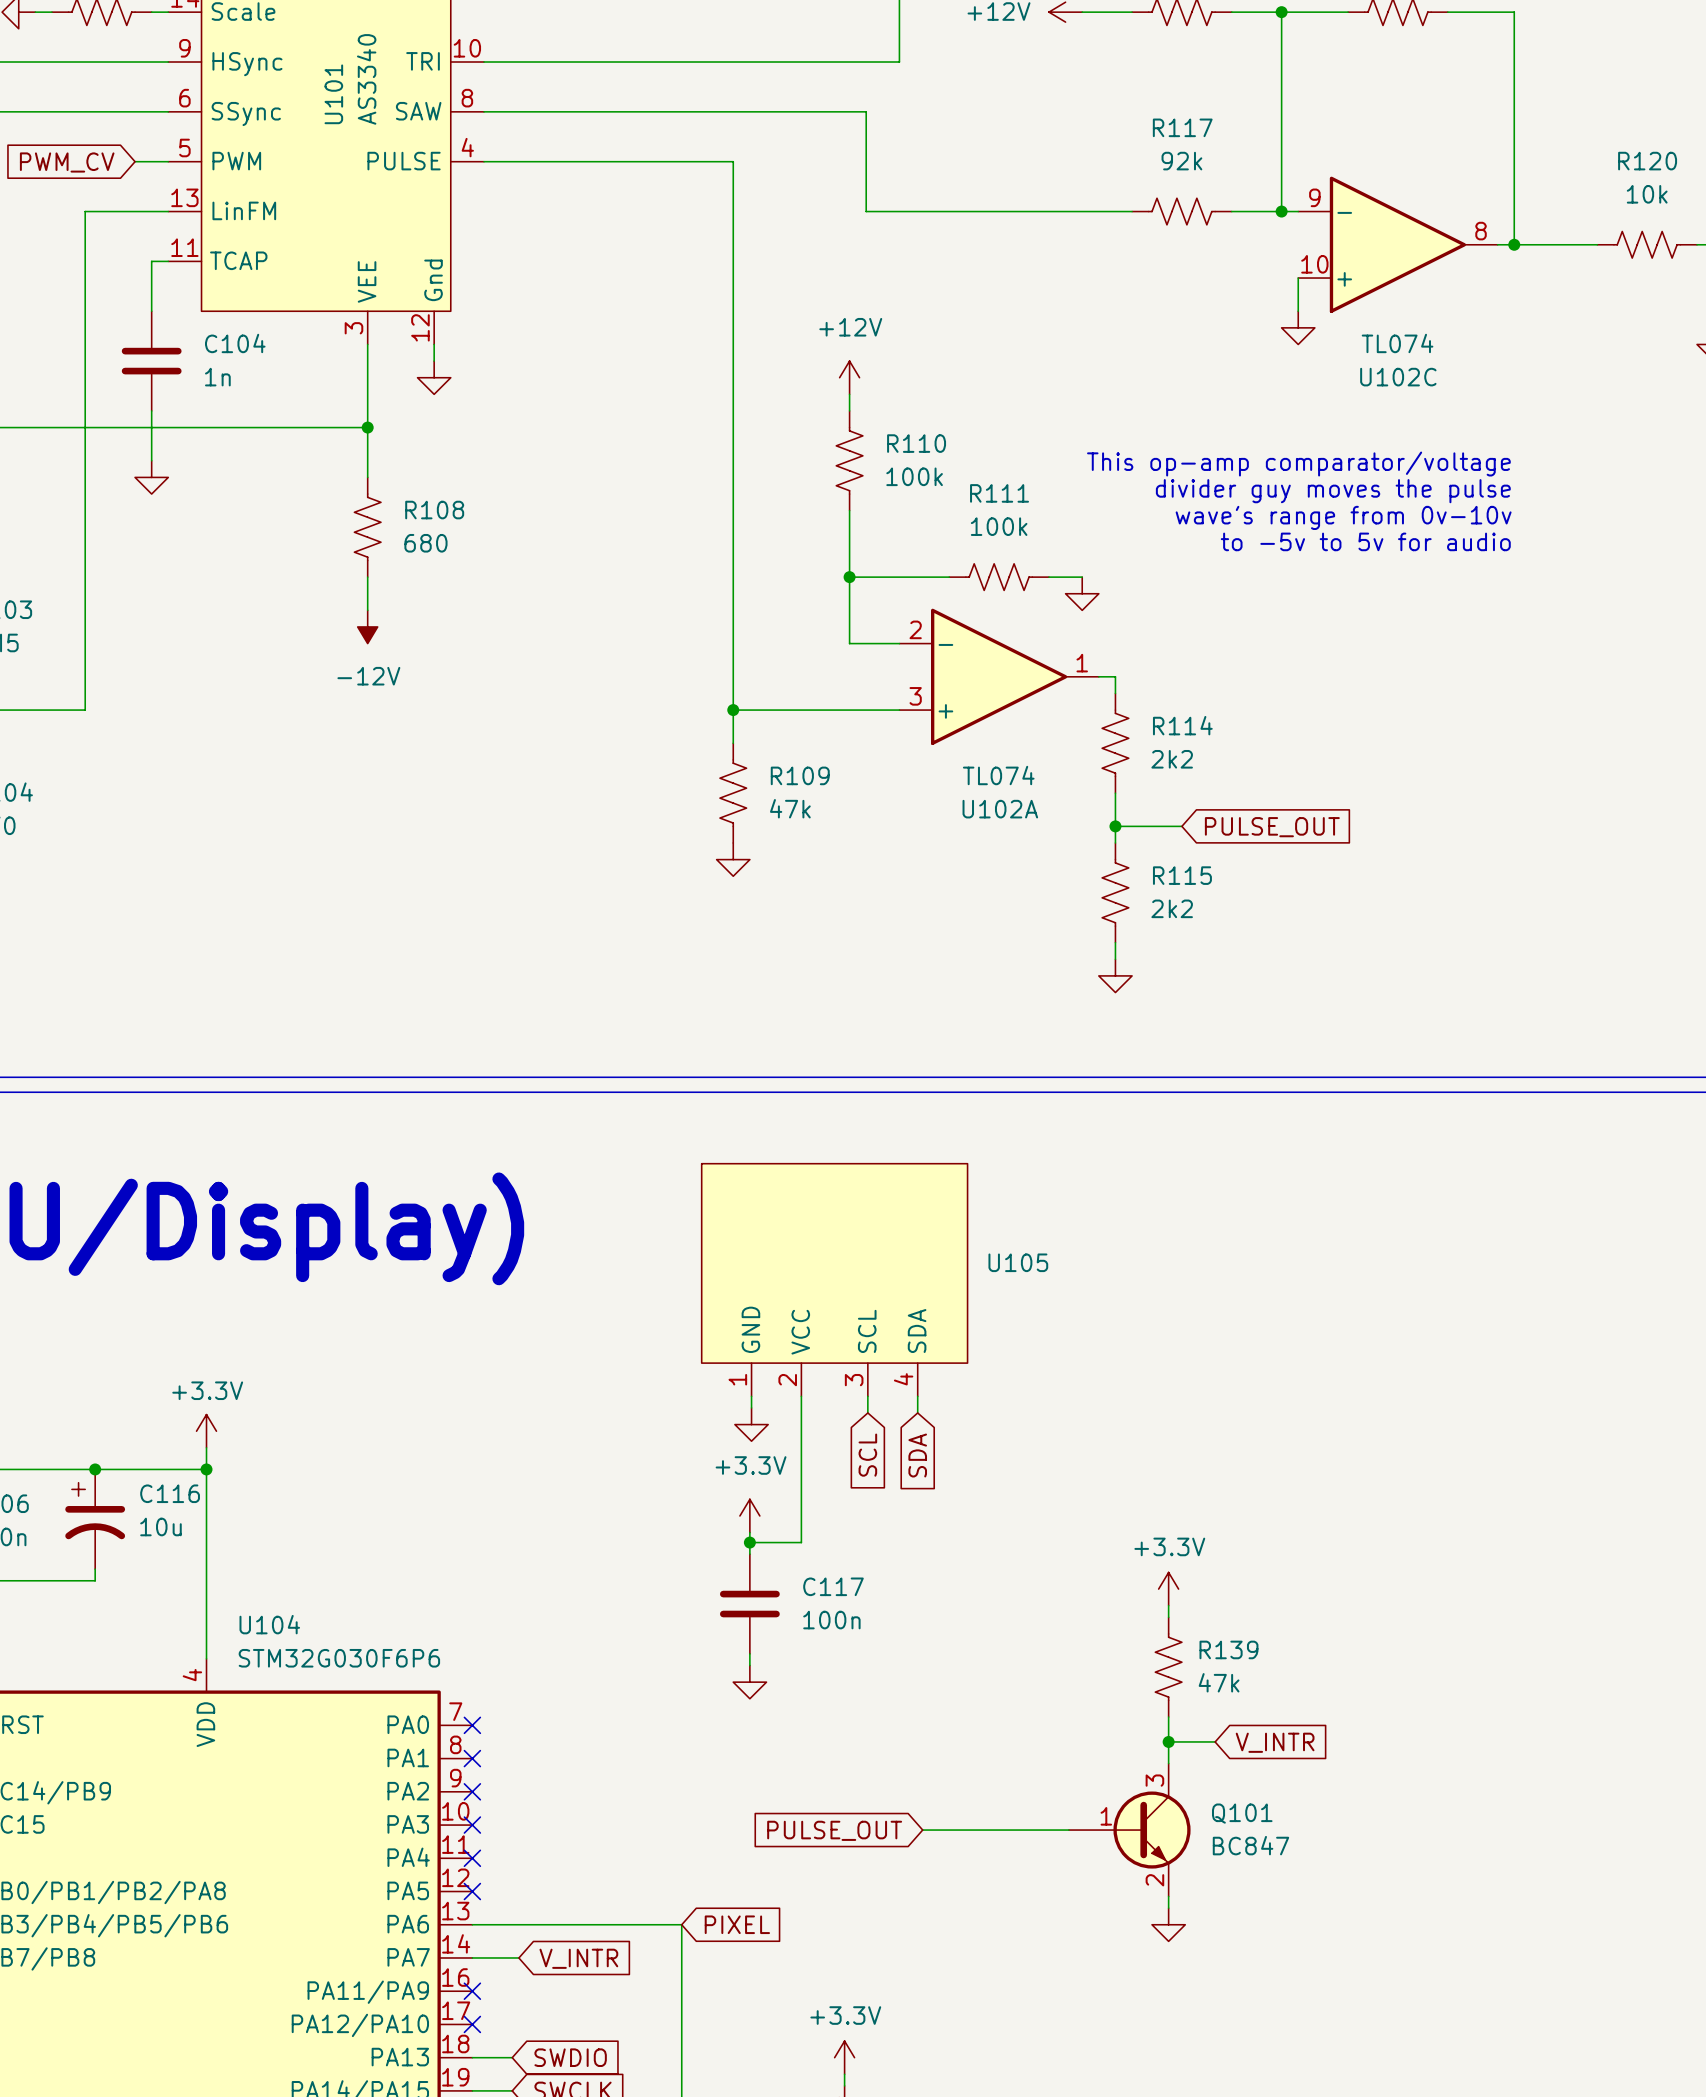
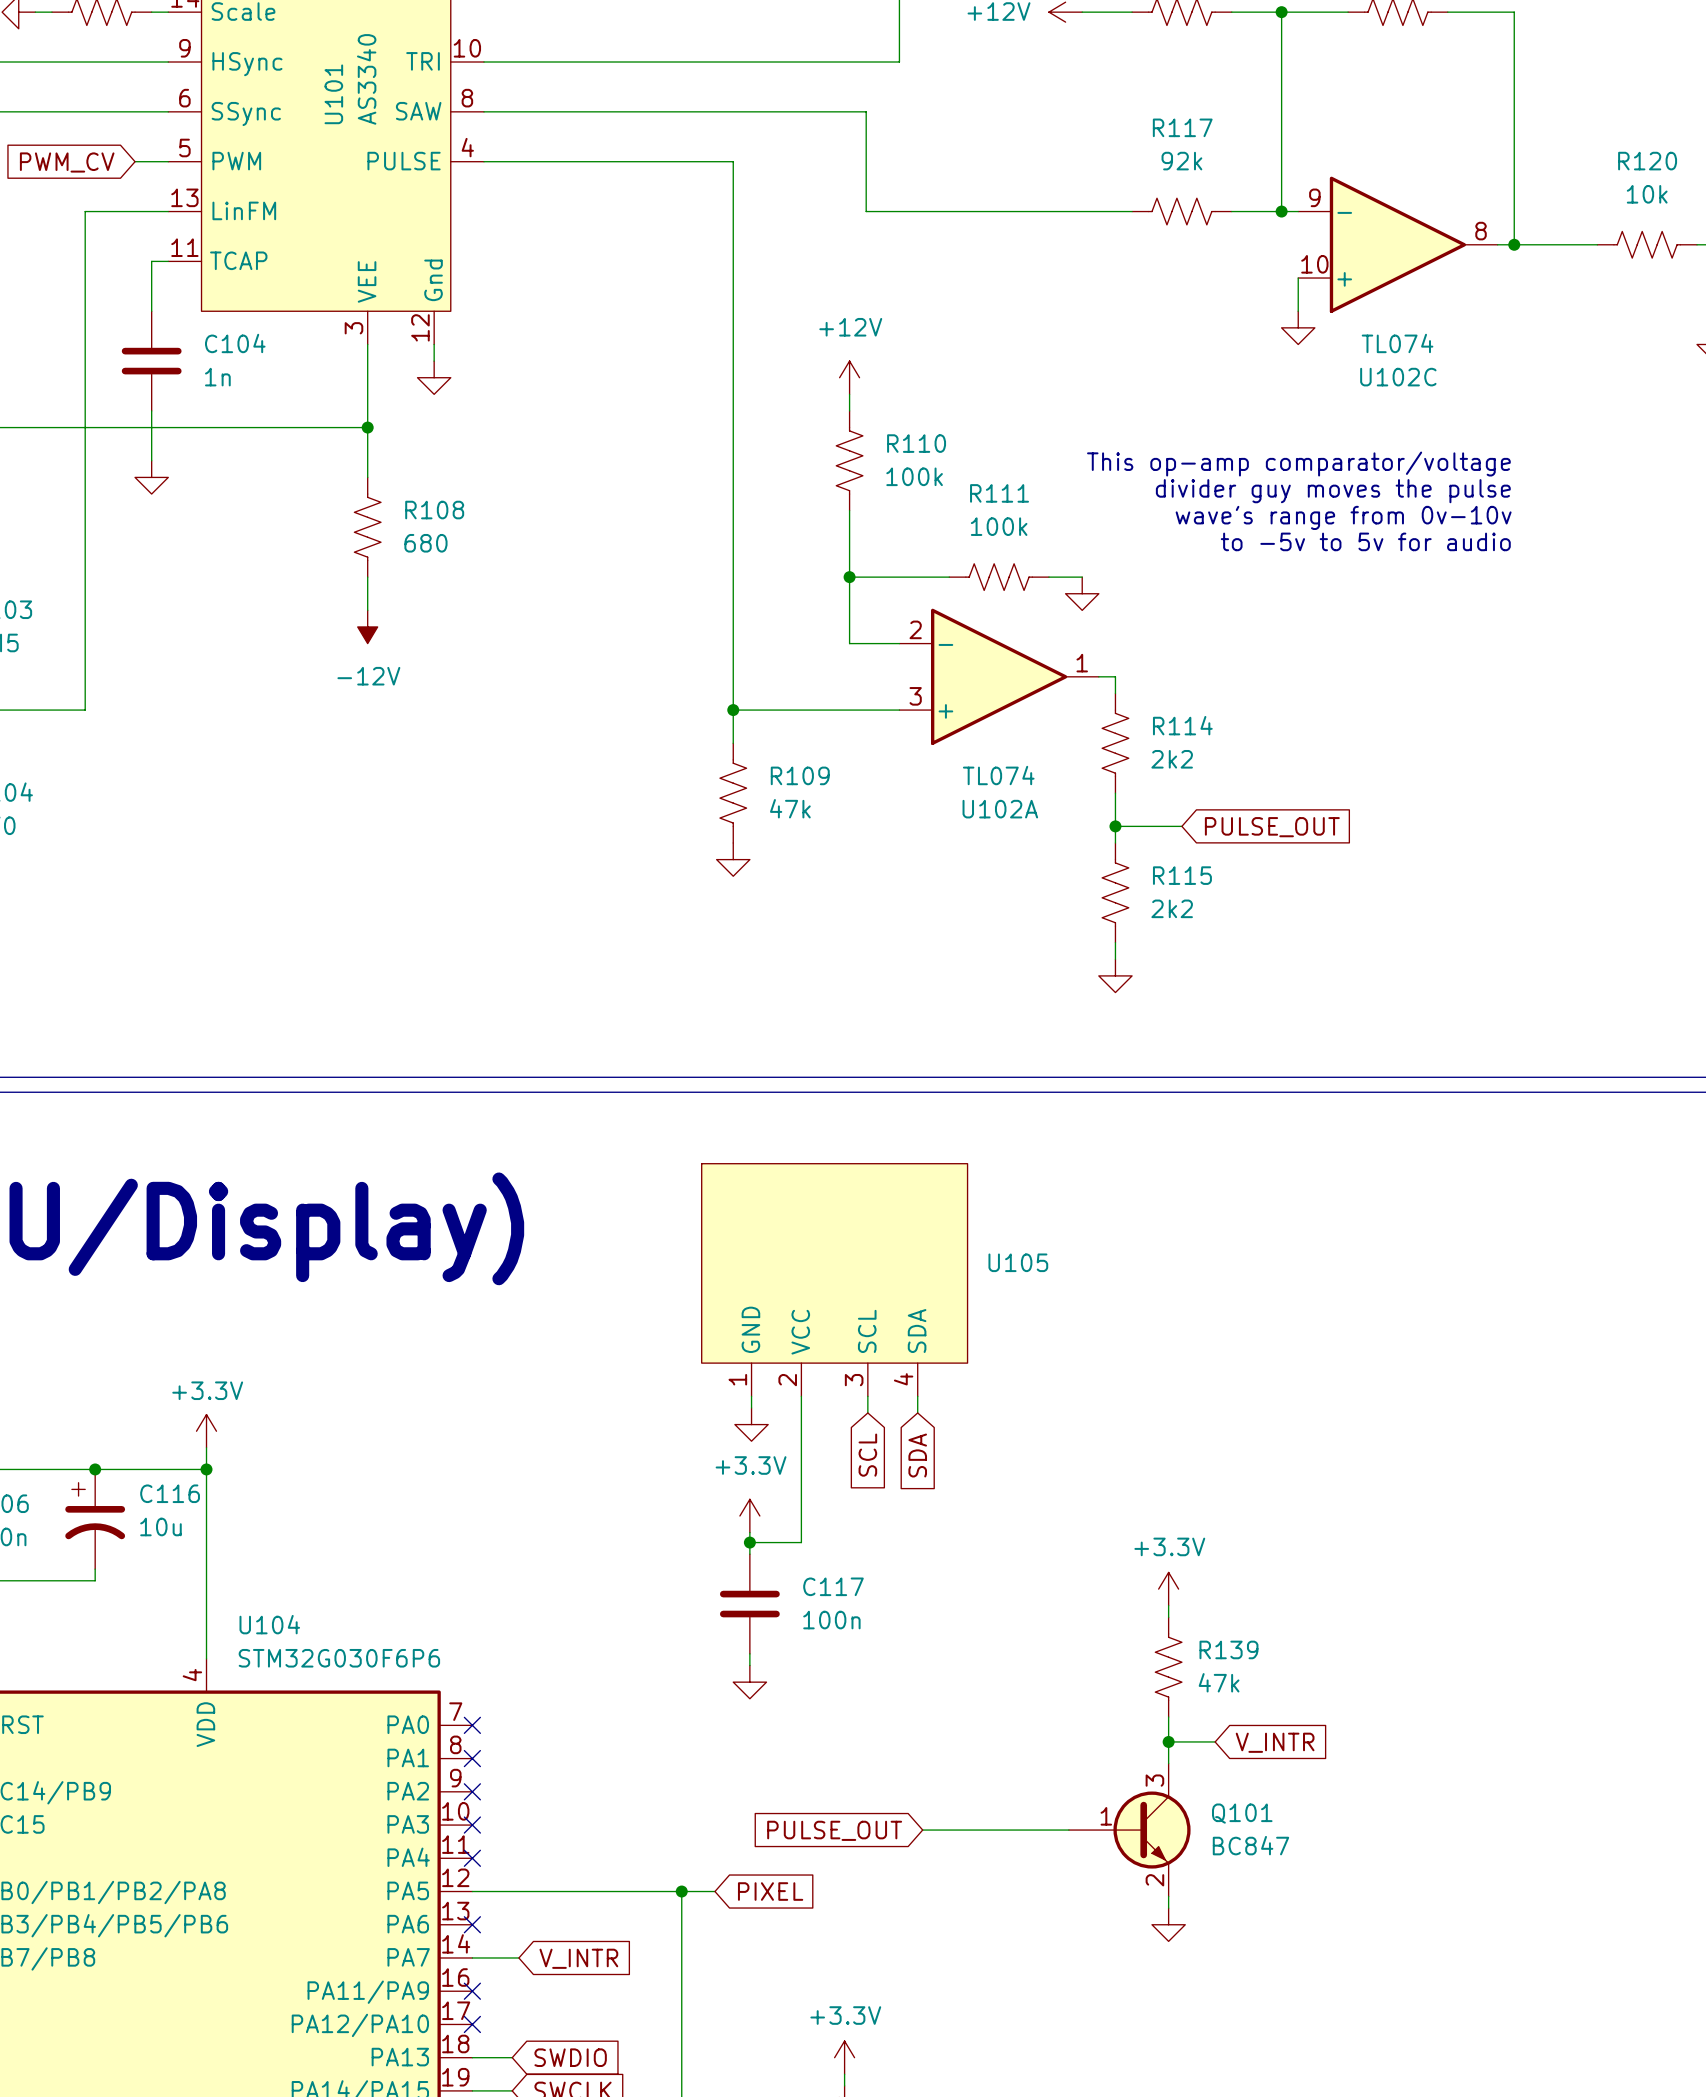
wire: none -> (472, 1891) (714, 1891)
no-connect mark position: (472, 1891) -> (472, 1924)
junction: none -> (681, 1891)
wire: (472, 1924) (681, 1924) -> (681, 1891) (681, 1924)
global label position: PIXEL (737, 1924) -> PIXEL (770, 1891)

